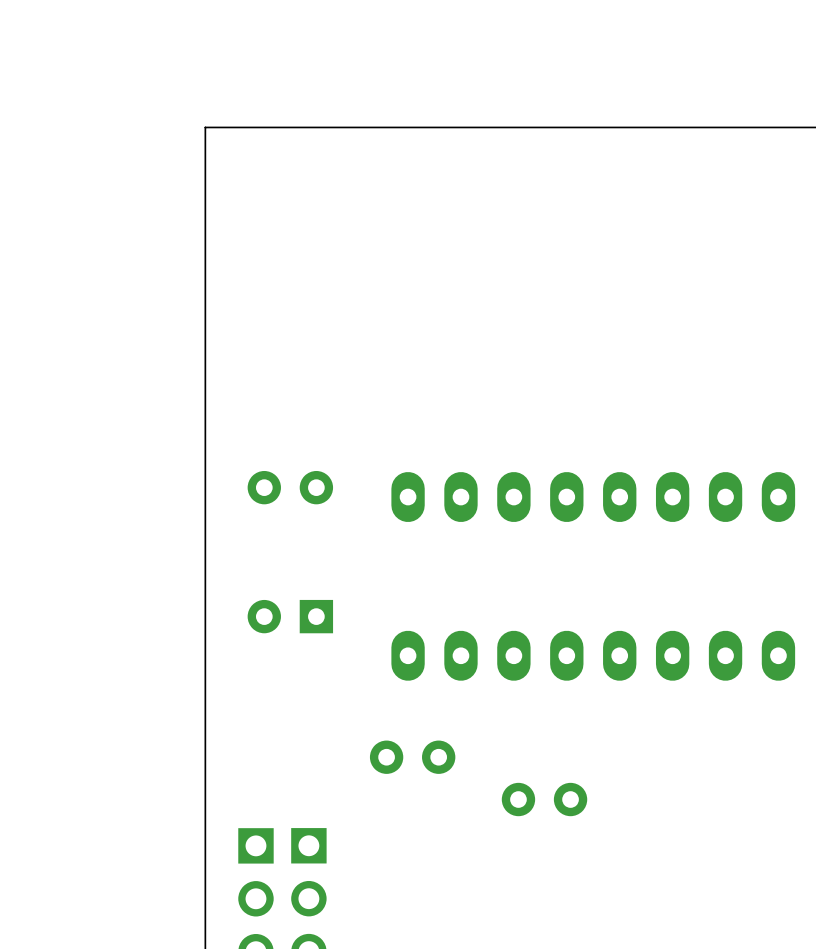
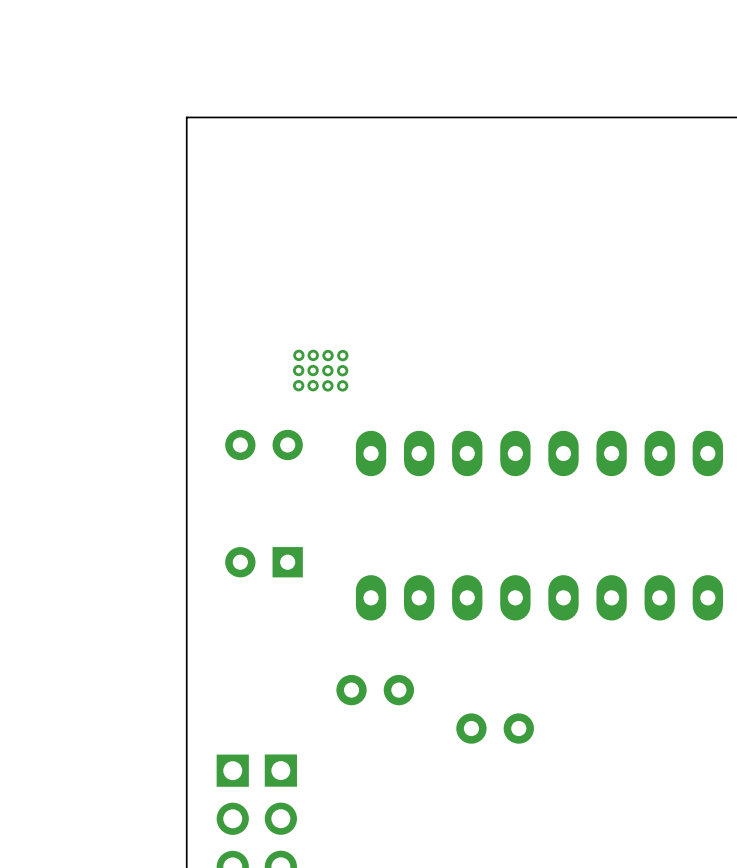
via: none -> (298, 355)
via: none -> (313, 355)
via: none -> (328, 355)
via: none -> (342, 355)
via: none -> (298, 370)
via: none -> (313, 370)
via: none -> (327, 370)
via: none -> (342, 370)
via: none -> (298, 385)
via: none -> (313, 385)
via: none -> (327, 385)
via: none -> (342, 385)

